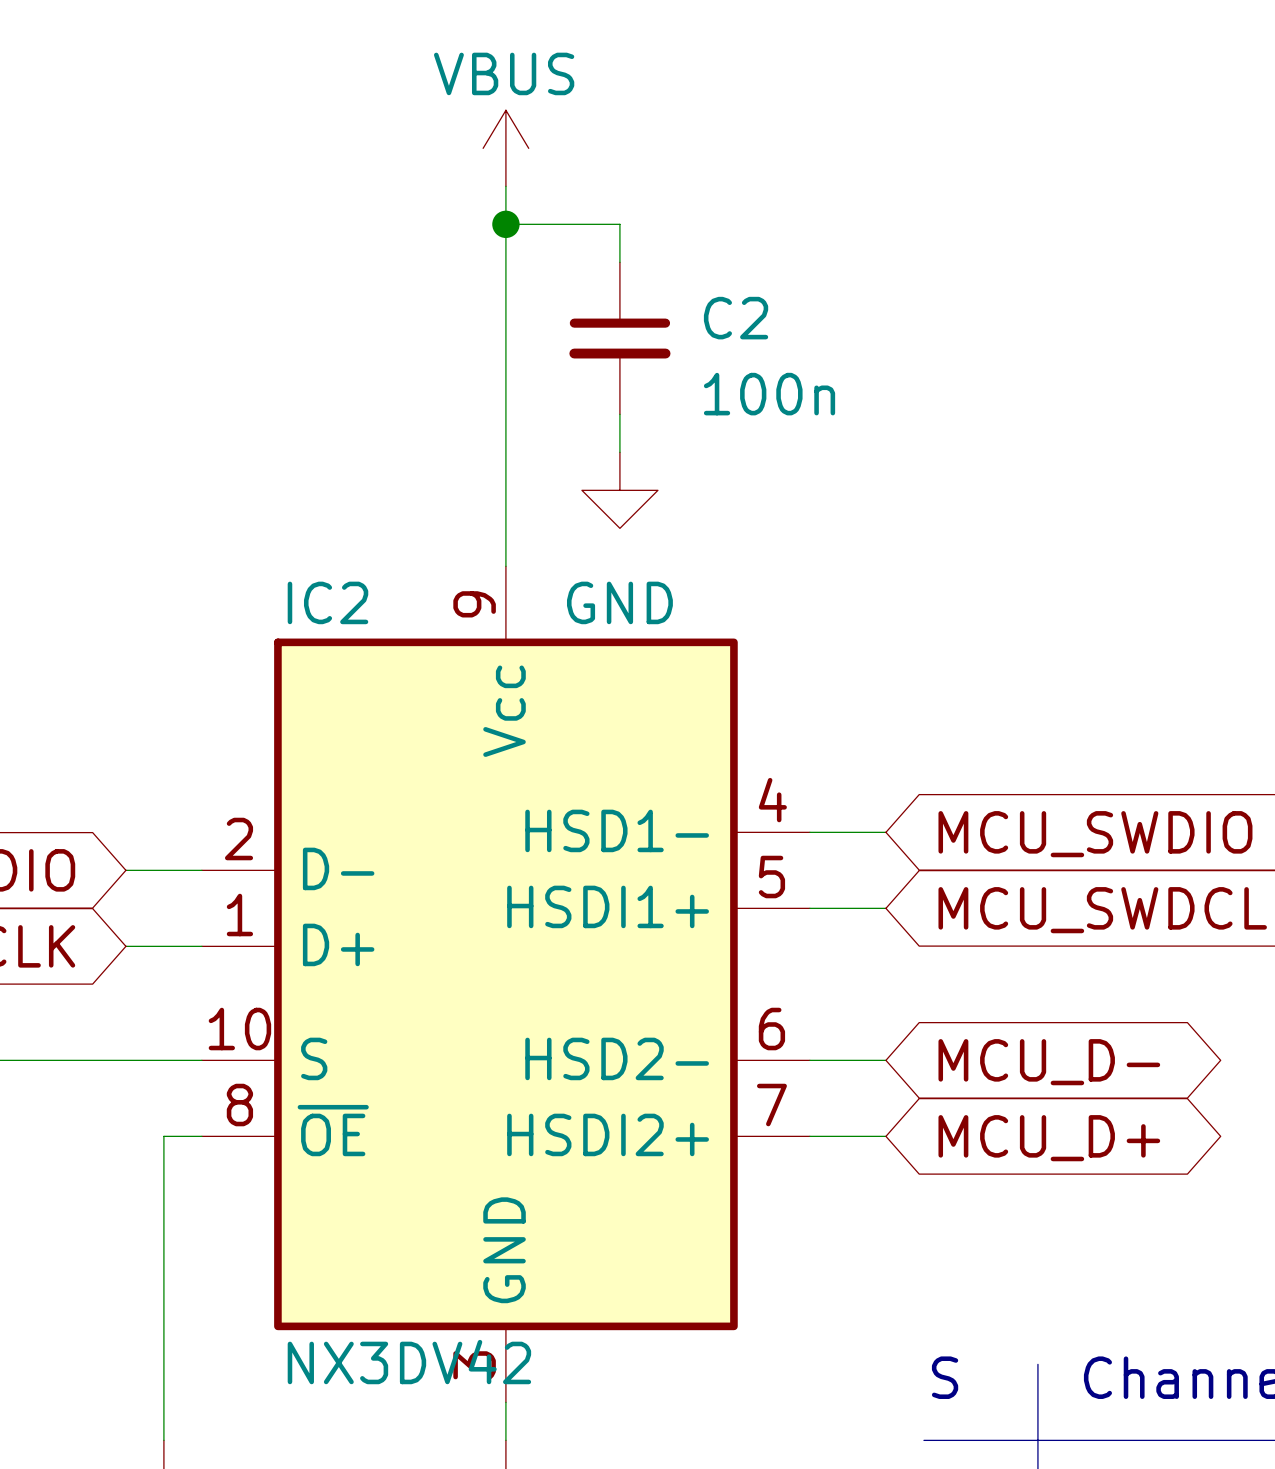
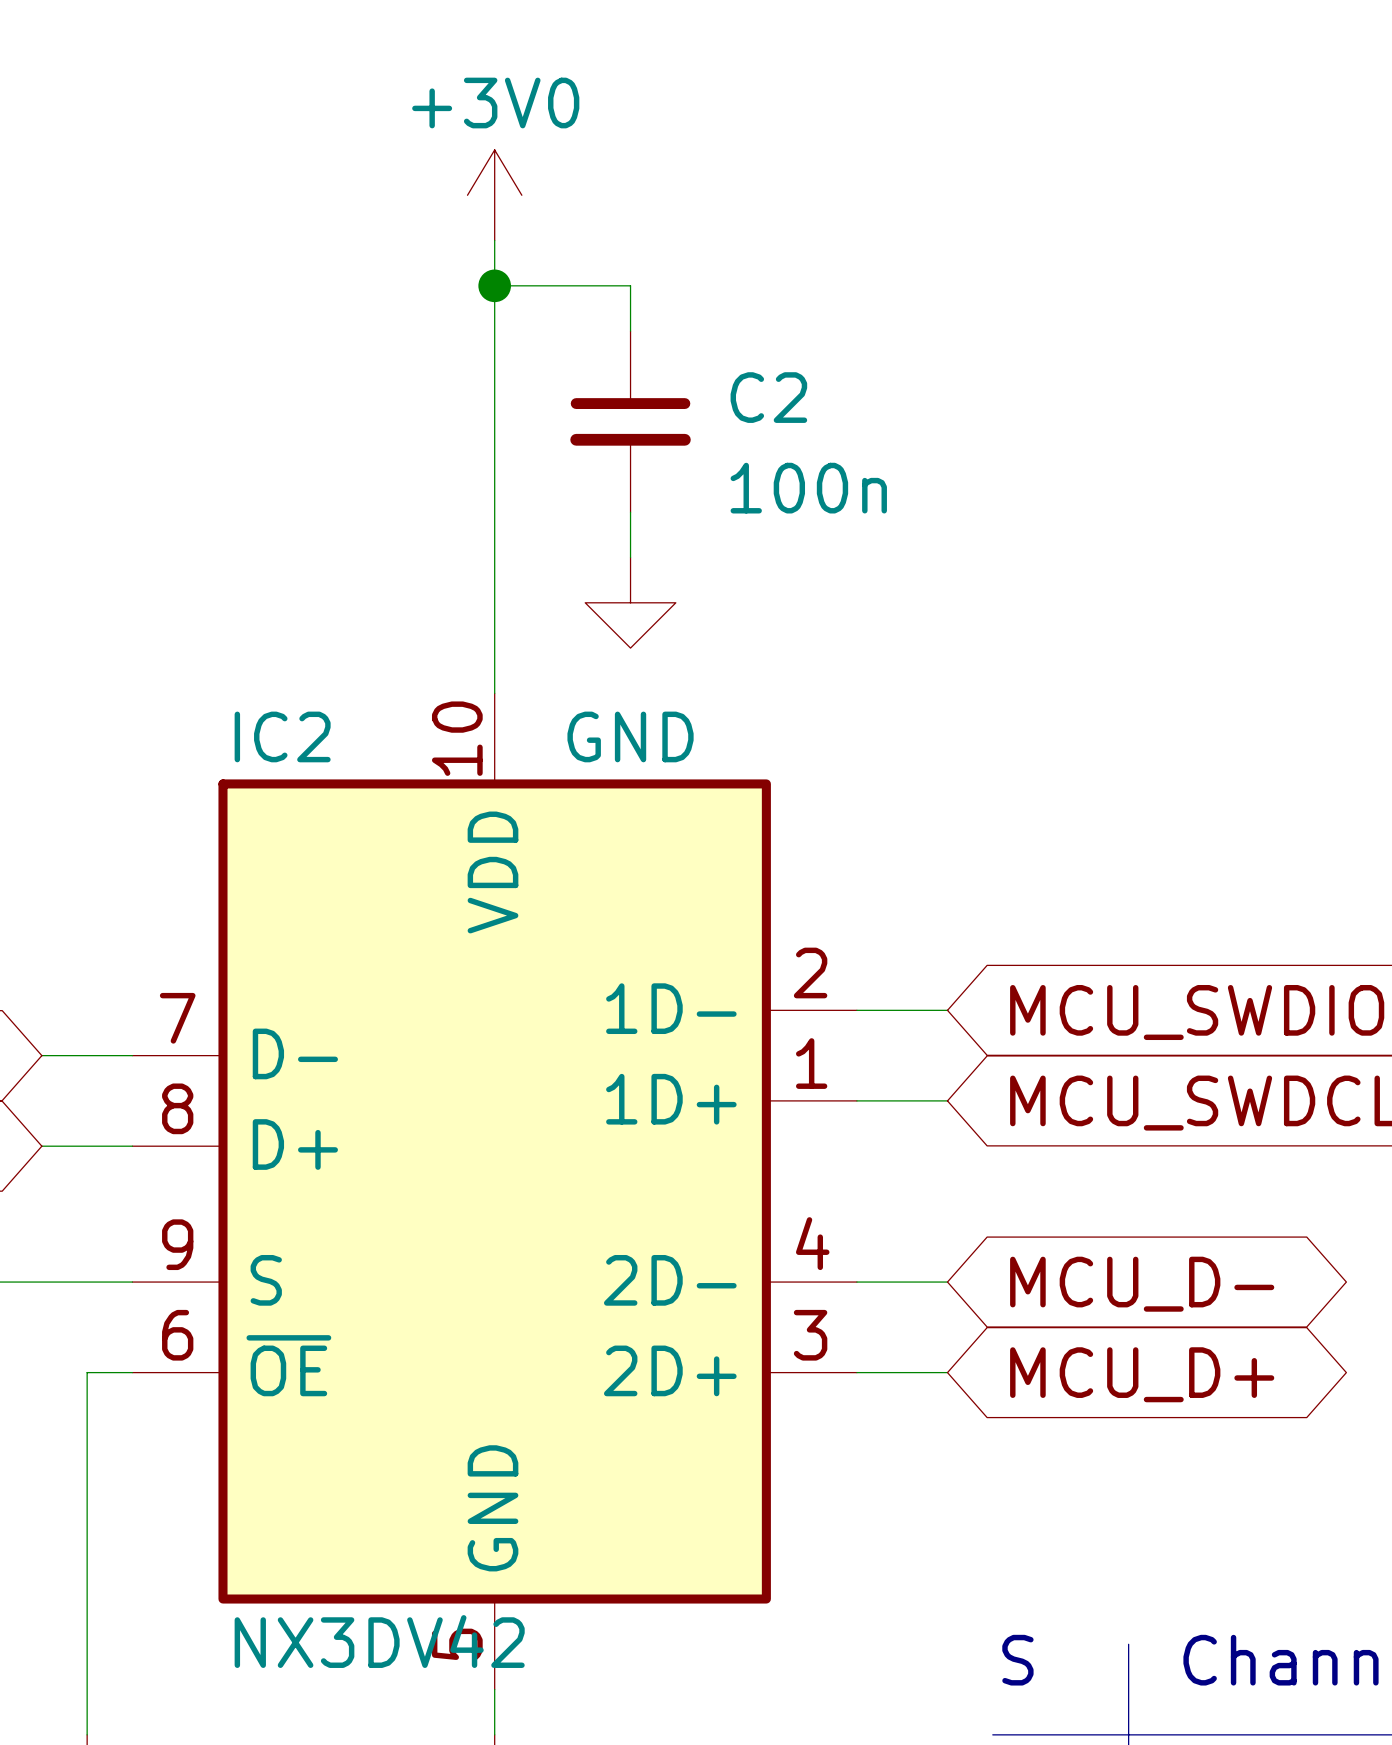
power symbol: VBUS (505, 148) -> +3V0 (494, 195)
IC2 symbol: [201, 566, 810, 1403] -> [132, 693, 857, 1690]

